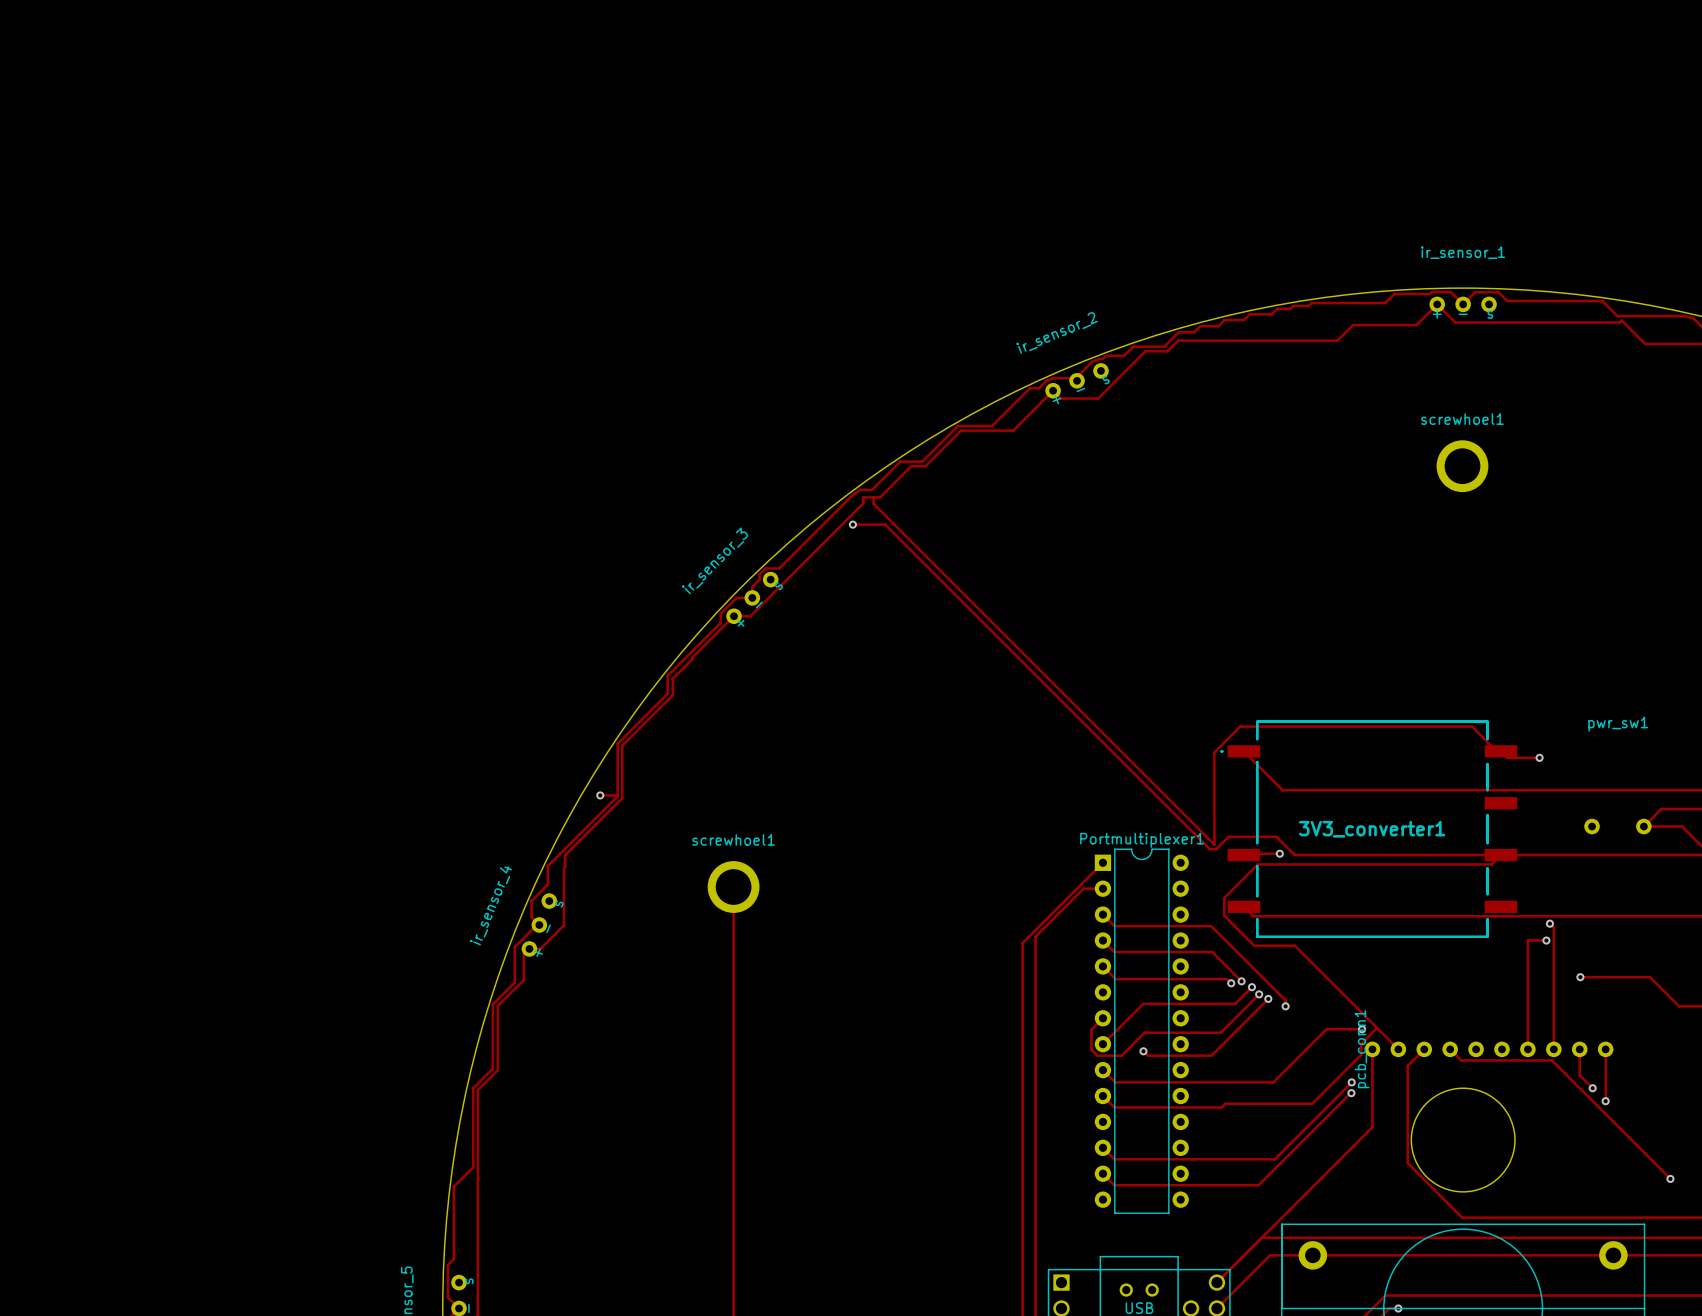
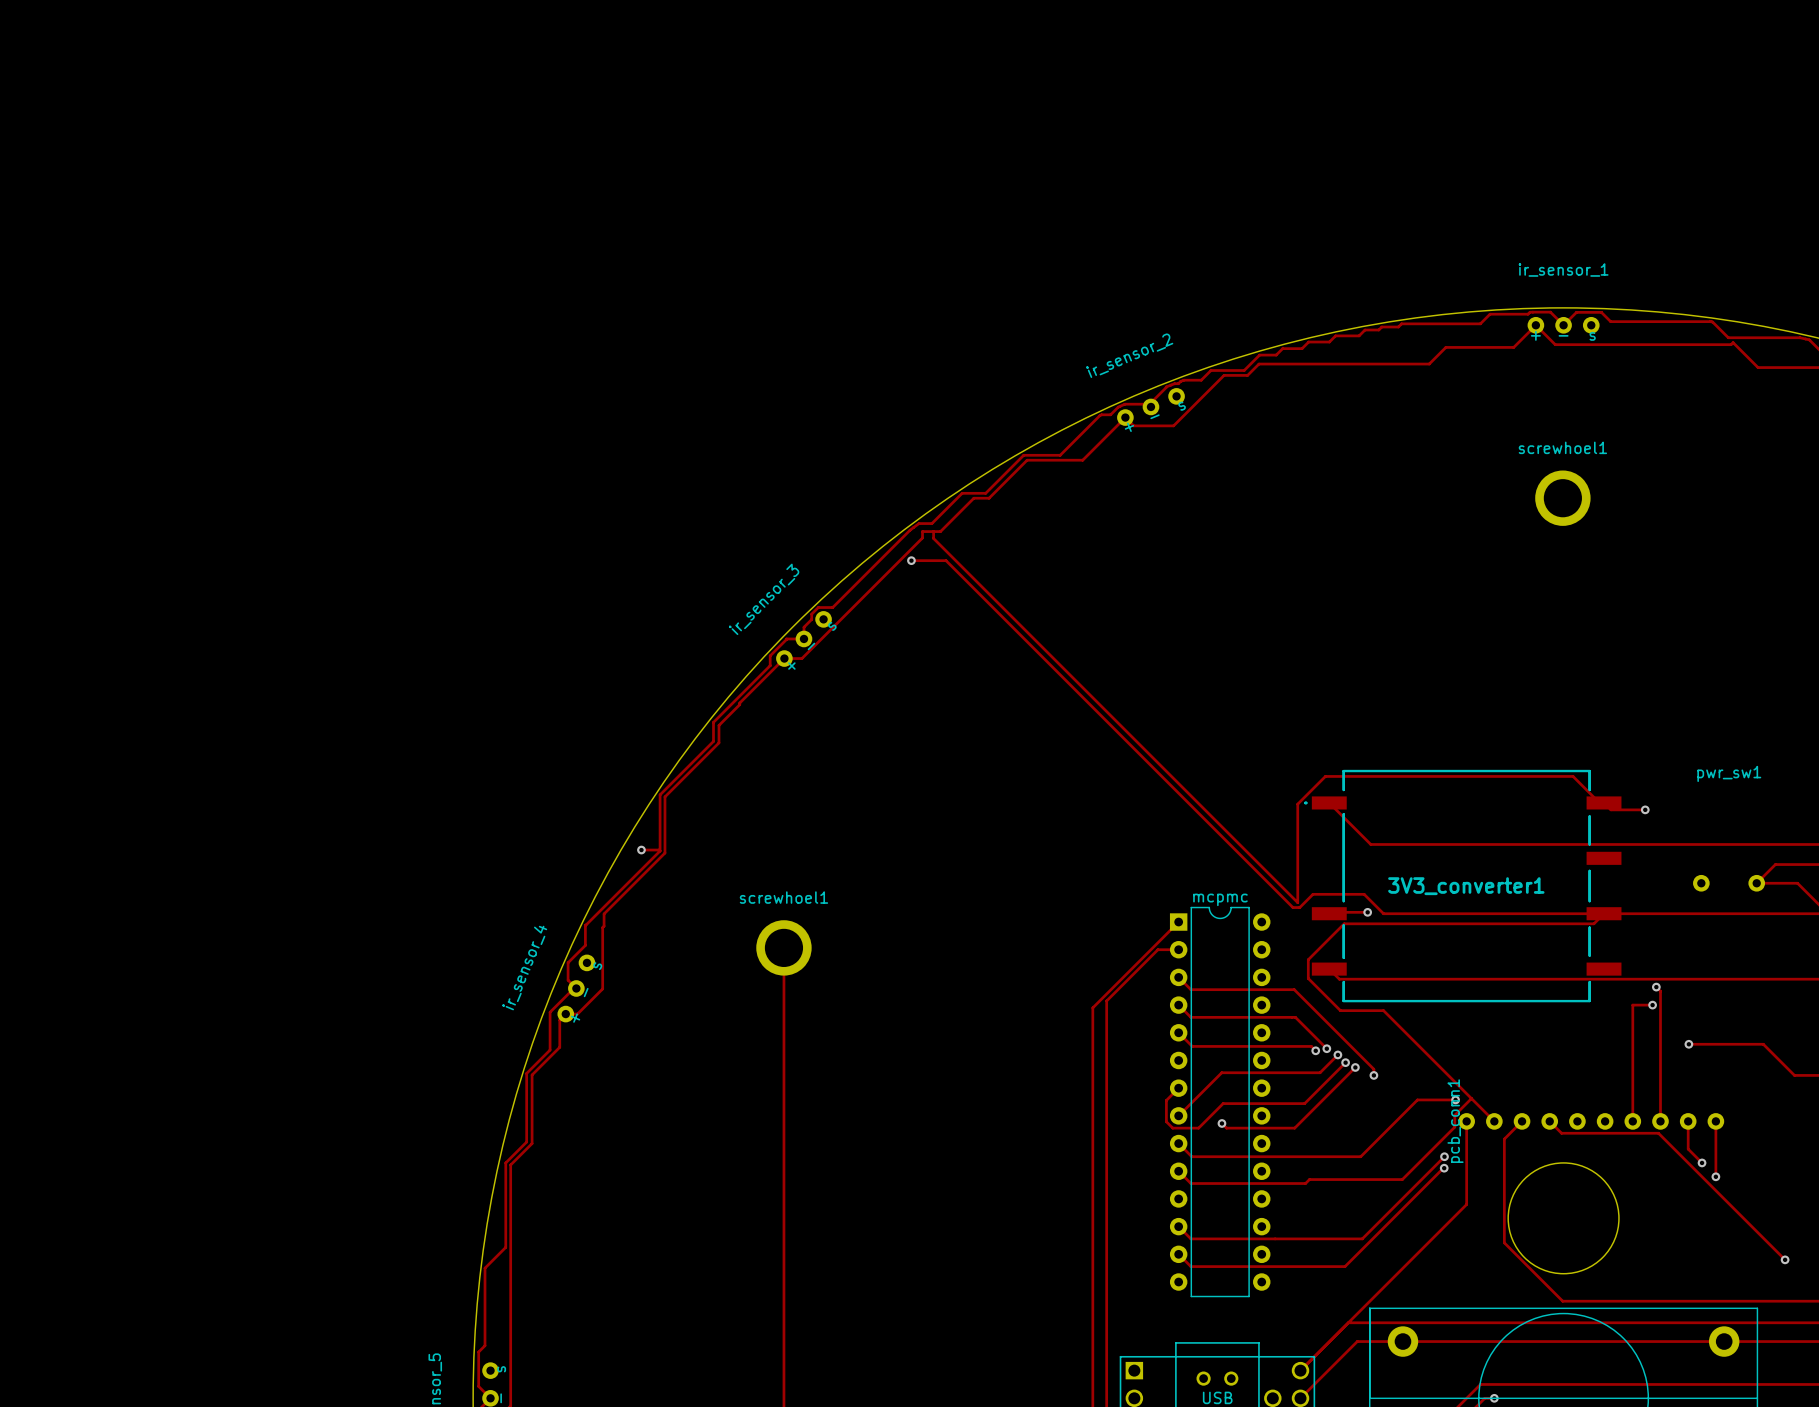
Portmultiplexer1 name: Portmultiplexer1 (1142, 840) -> mcpmc (1220, 899)

